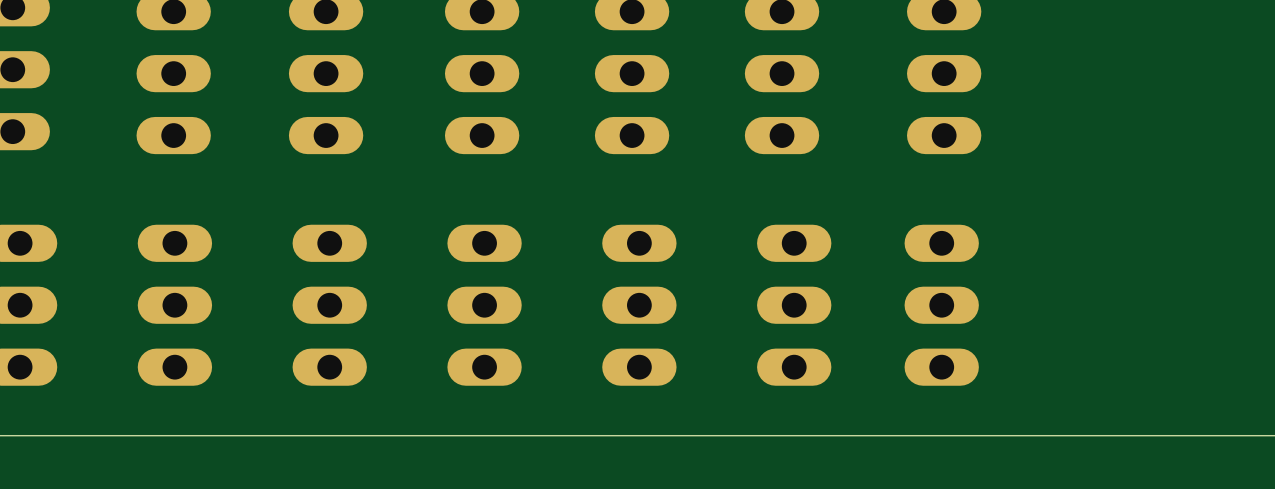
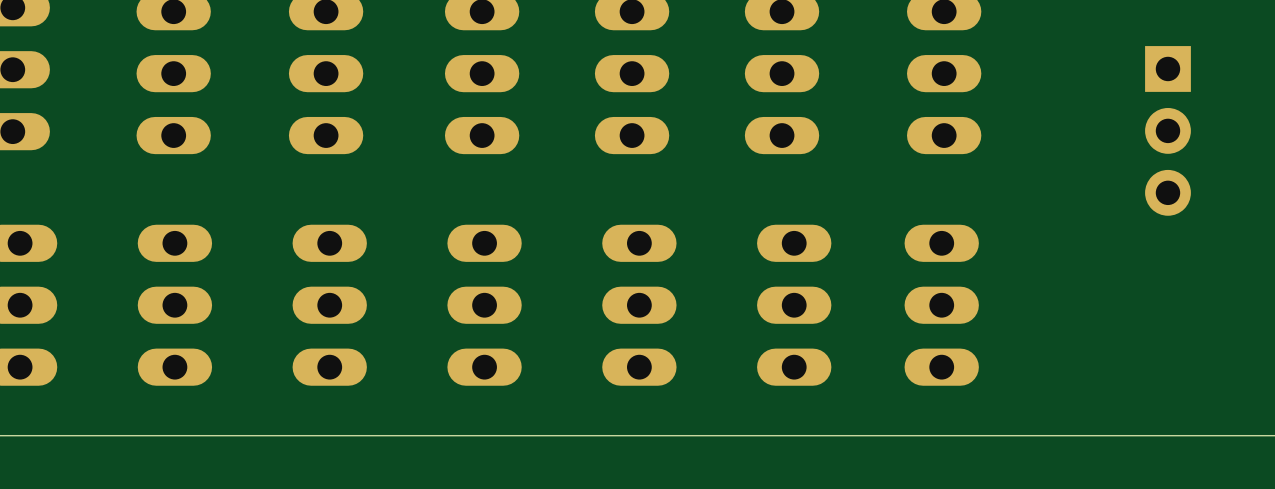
part: none -> (1167, 130)

